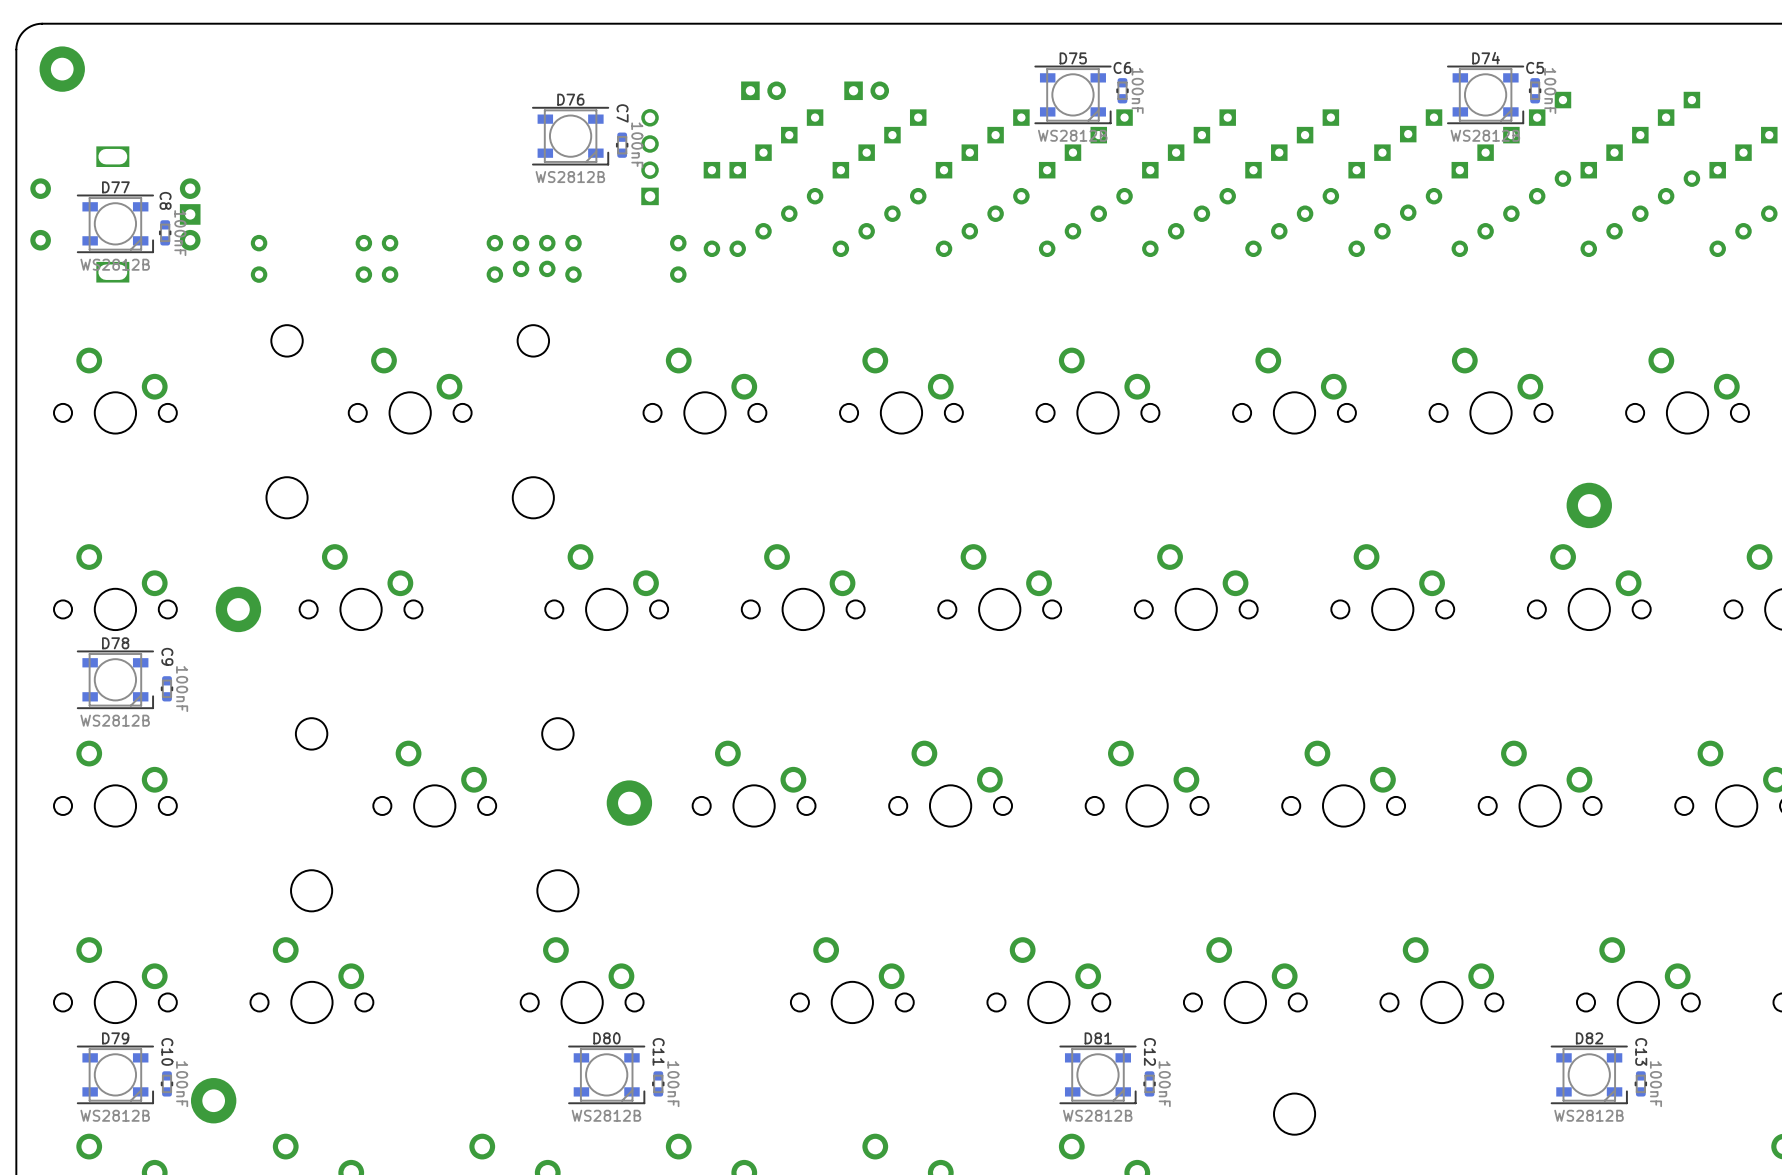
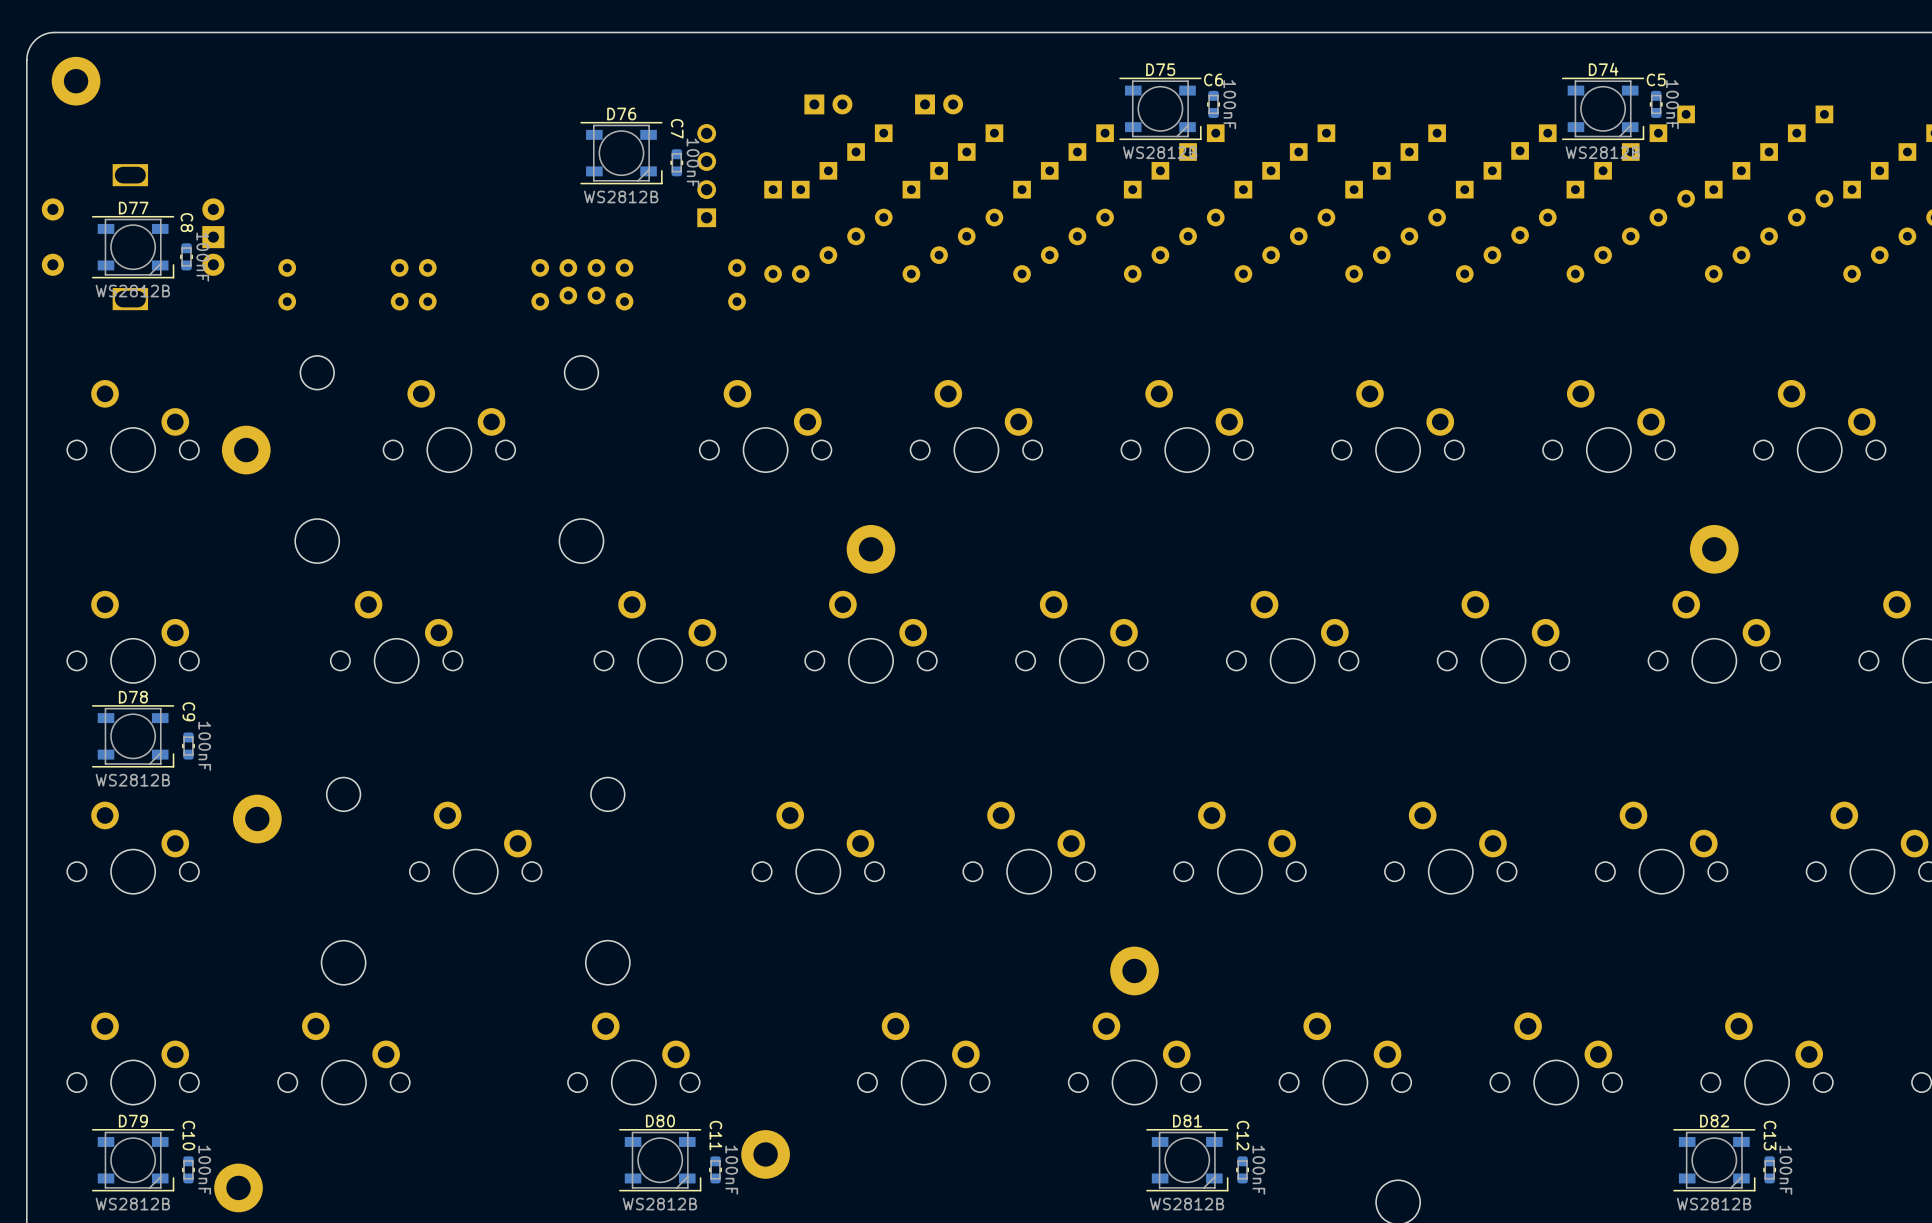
part: none -> (246, 450)
part: none -> (871, 549)
part: (238, 609) -> none
part: none -> (257, 818)
part: (629, 803) -> none
part: none -> (1134, 970)
part: none -> (765, 1154)

